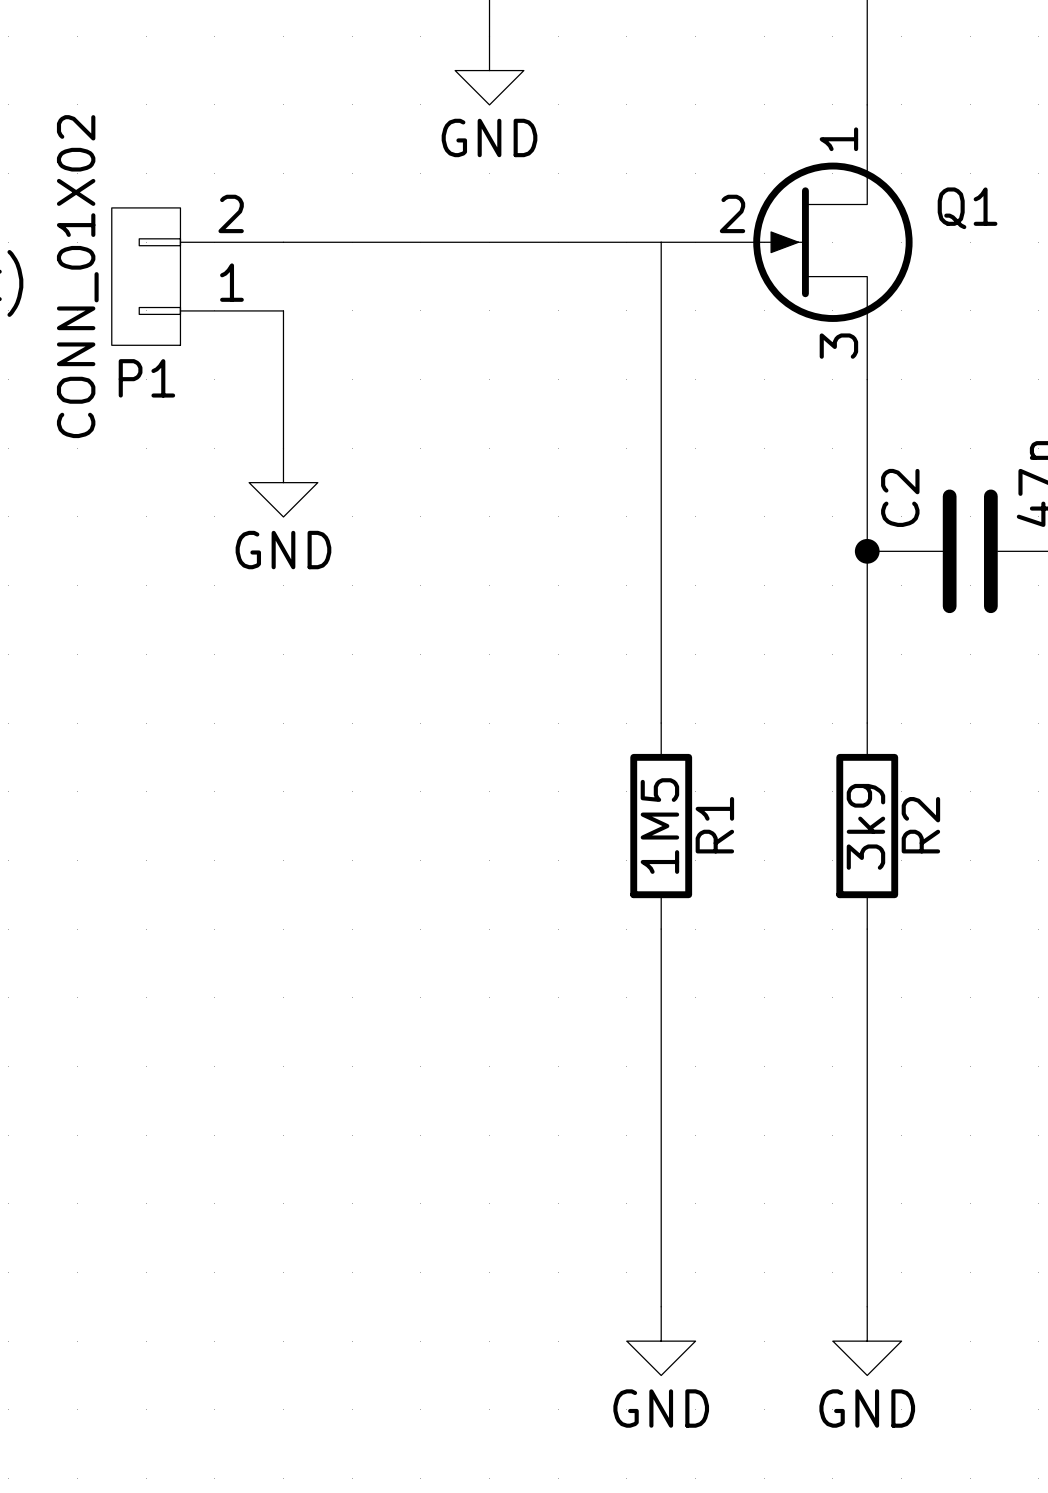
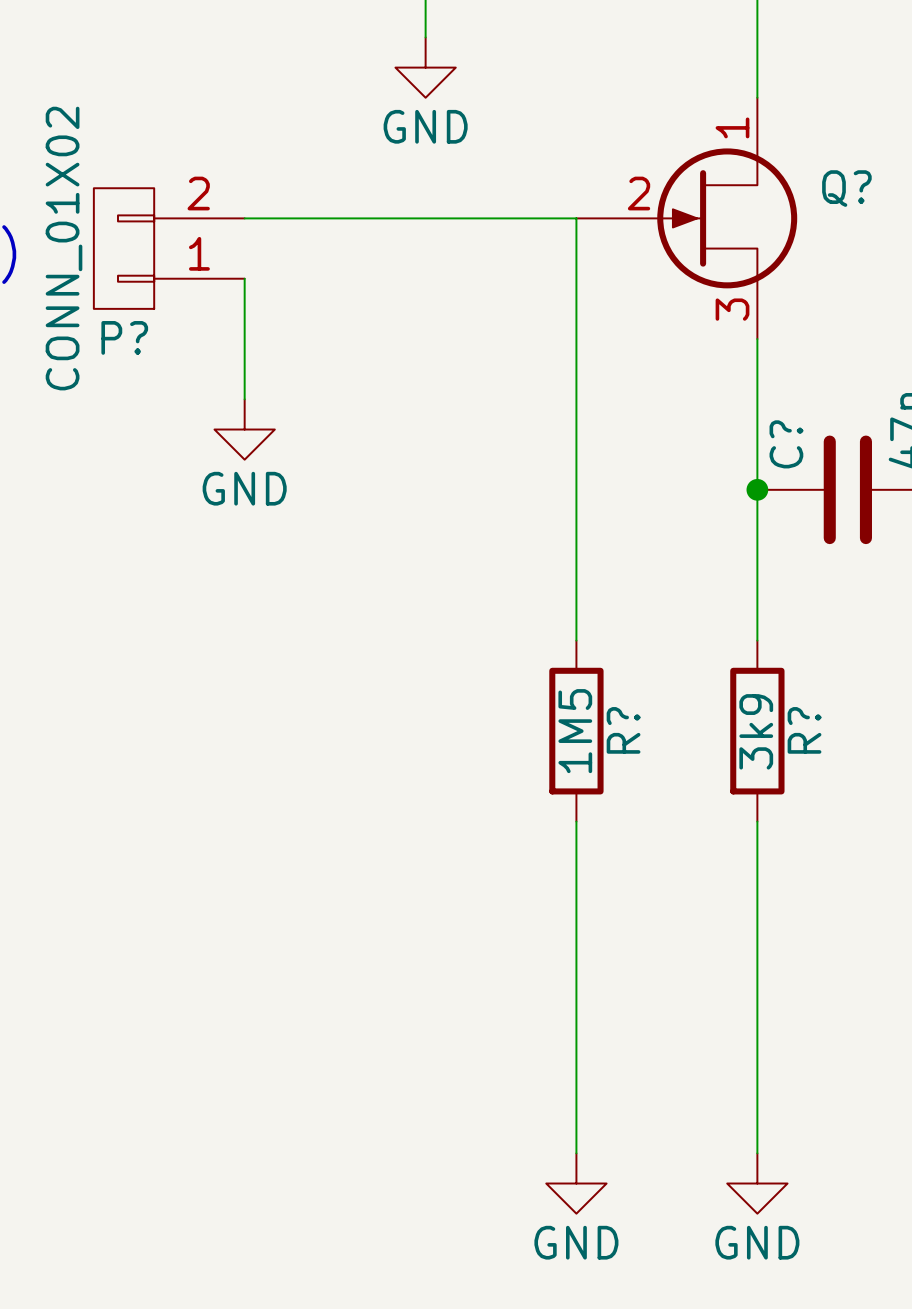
Q1 name: Q1 (967, 208) -> Q? (846, 188)
P1 name: P1 (146, 378) -> P? (124, 337)
C2 name: C2 (900, 497) -> C? (786, 444)
R1 name: R1 (714, 825) -> R? (623, 730)
R2 name: R2 (920, 825) -> R? (804, 730)

